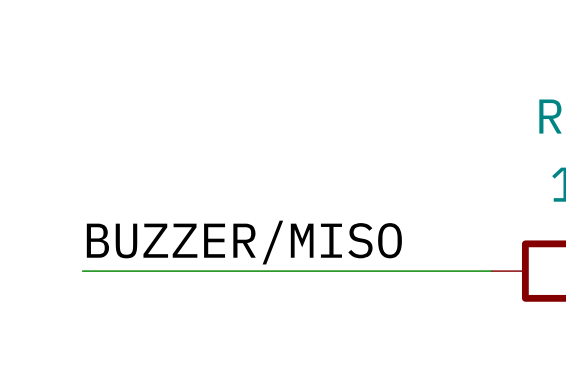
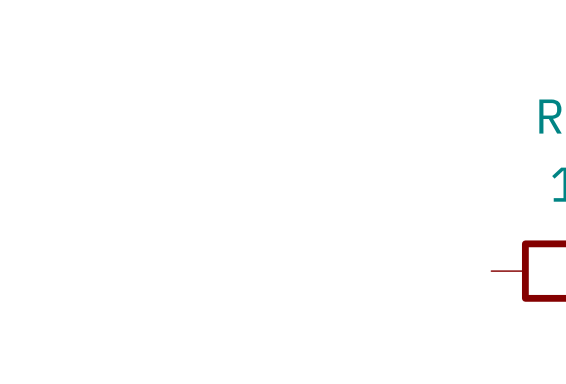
label: BUZZER/MISO (244, 242) -> none
wire: (82, 271) (491, 271) -> none

